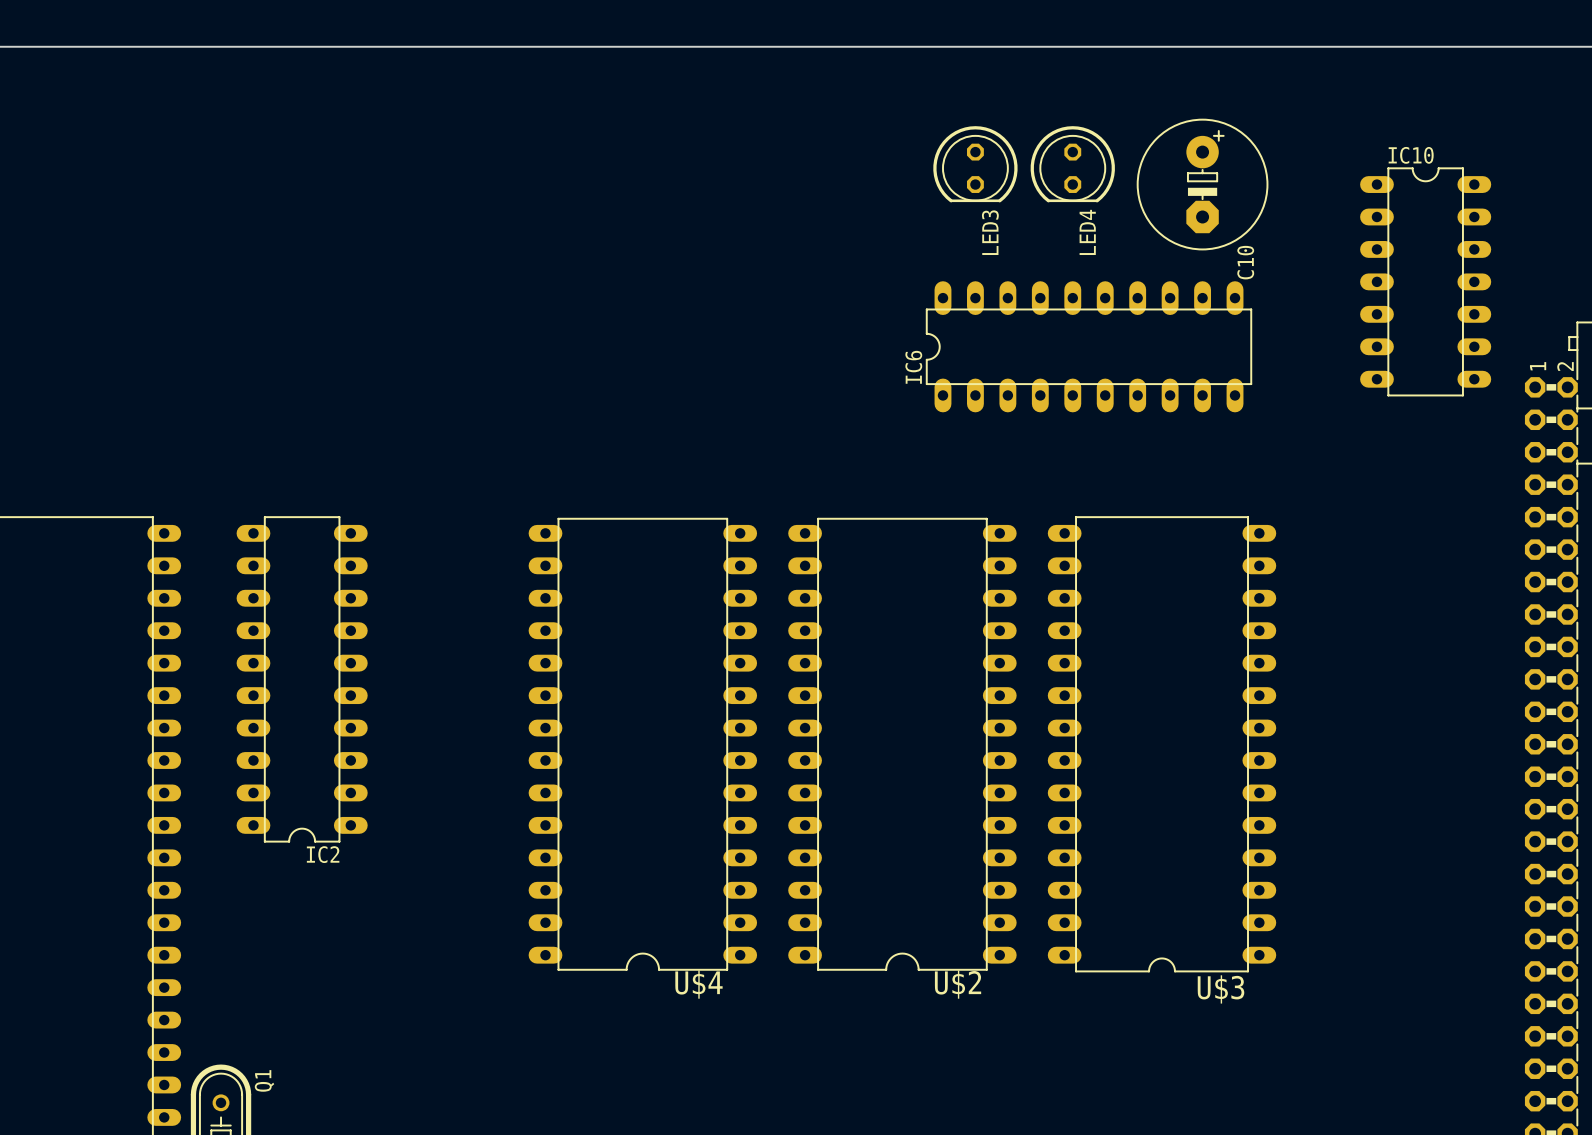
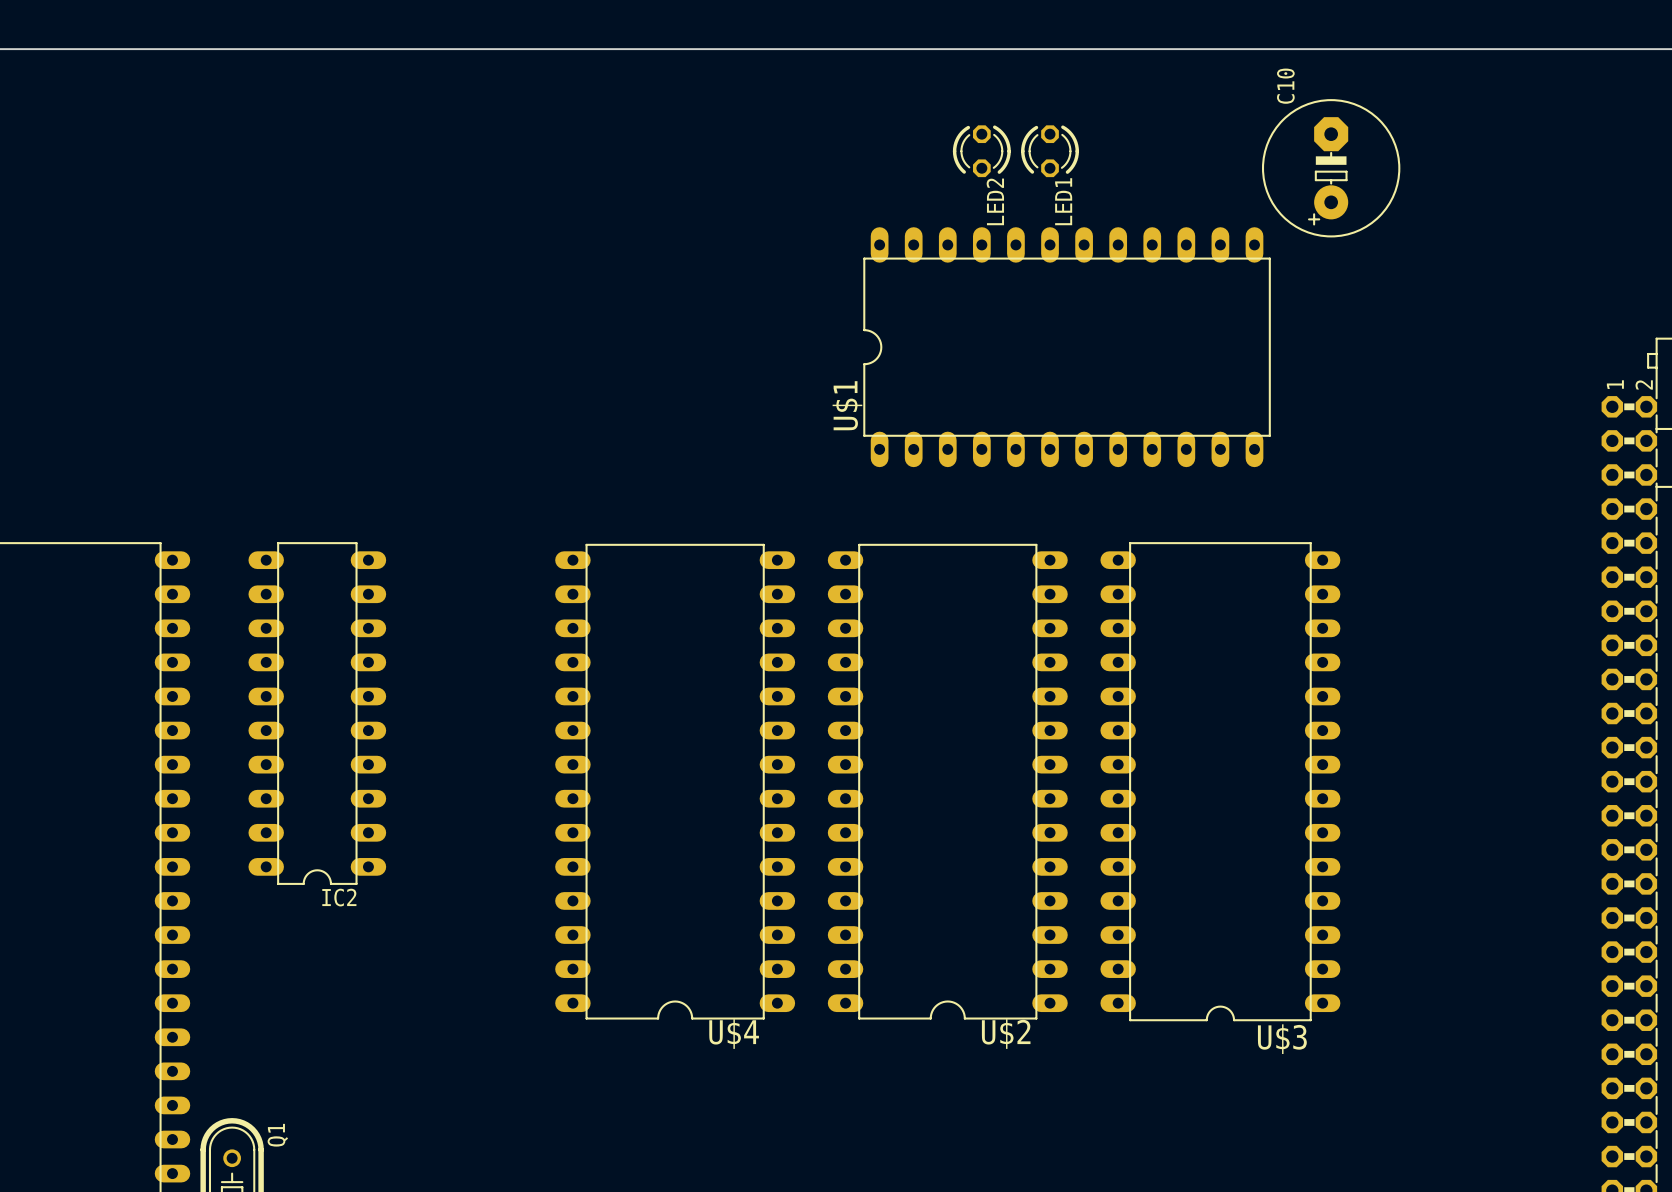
LED2: none -> (981, 151)
LED1: none -> (1050, 151)
LED3: (975, 164) -> none
LED4: (1072, 164) -> none
C10 rotation: 0° (1202, 184) -> 180° (1331, 168)
IC10: (1425, 281) -> none
U$1: none -> (1067, 347)
IC6: (1089, 346) -> none

